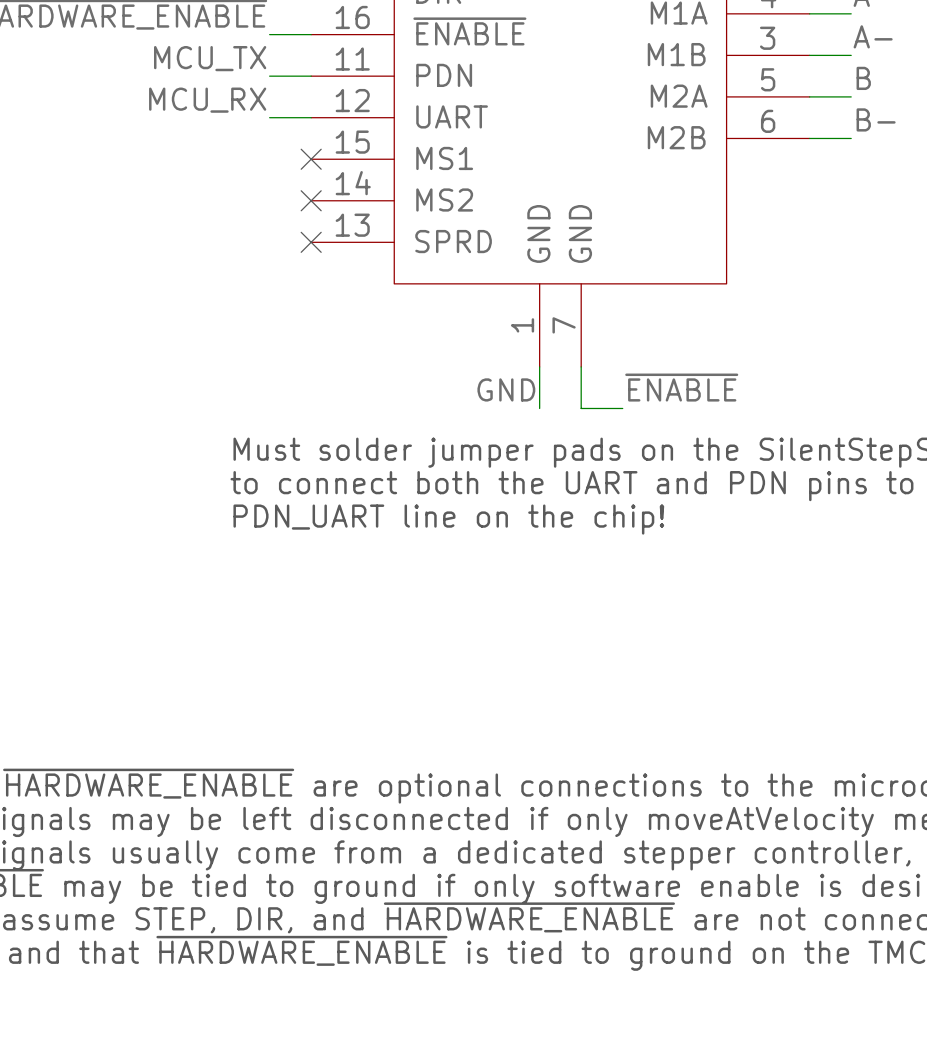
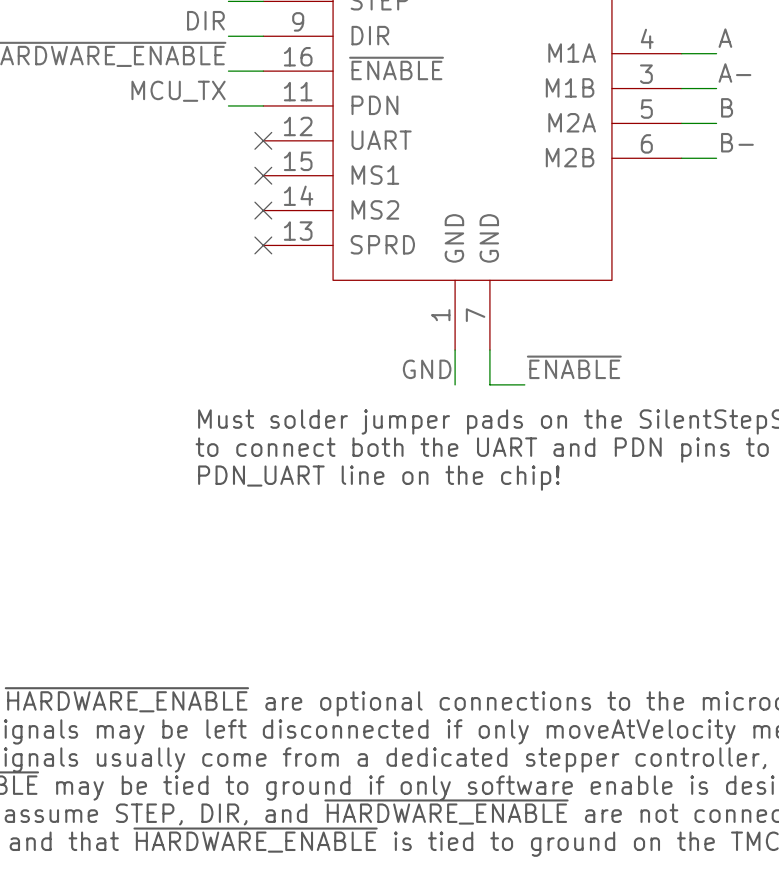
label: MCU_RX (207, 100) -> none
wire: (269, 117) (311, 117) -> none
no-connect mark: none -> (263, 140)

